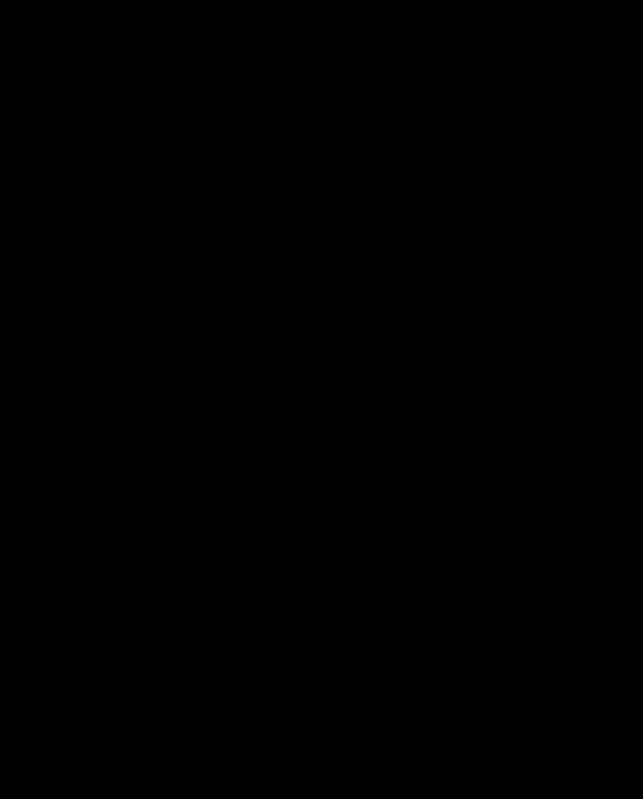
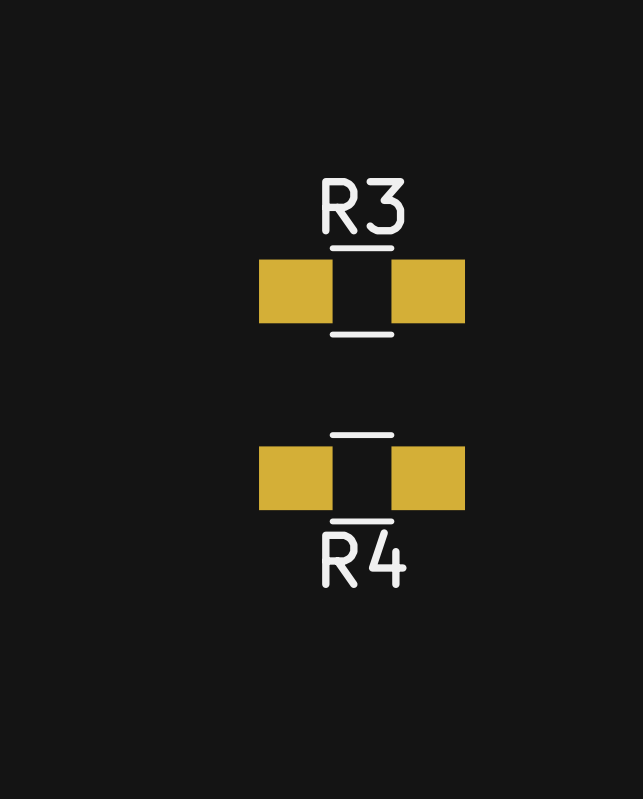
R3: none -> (362, 291)
R4: none -> (362, 478)

